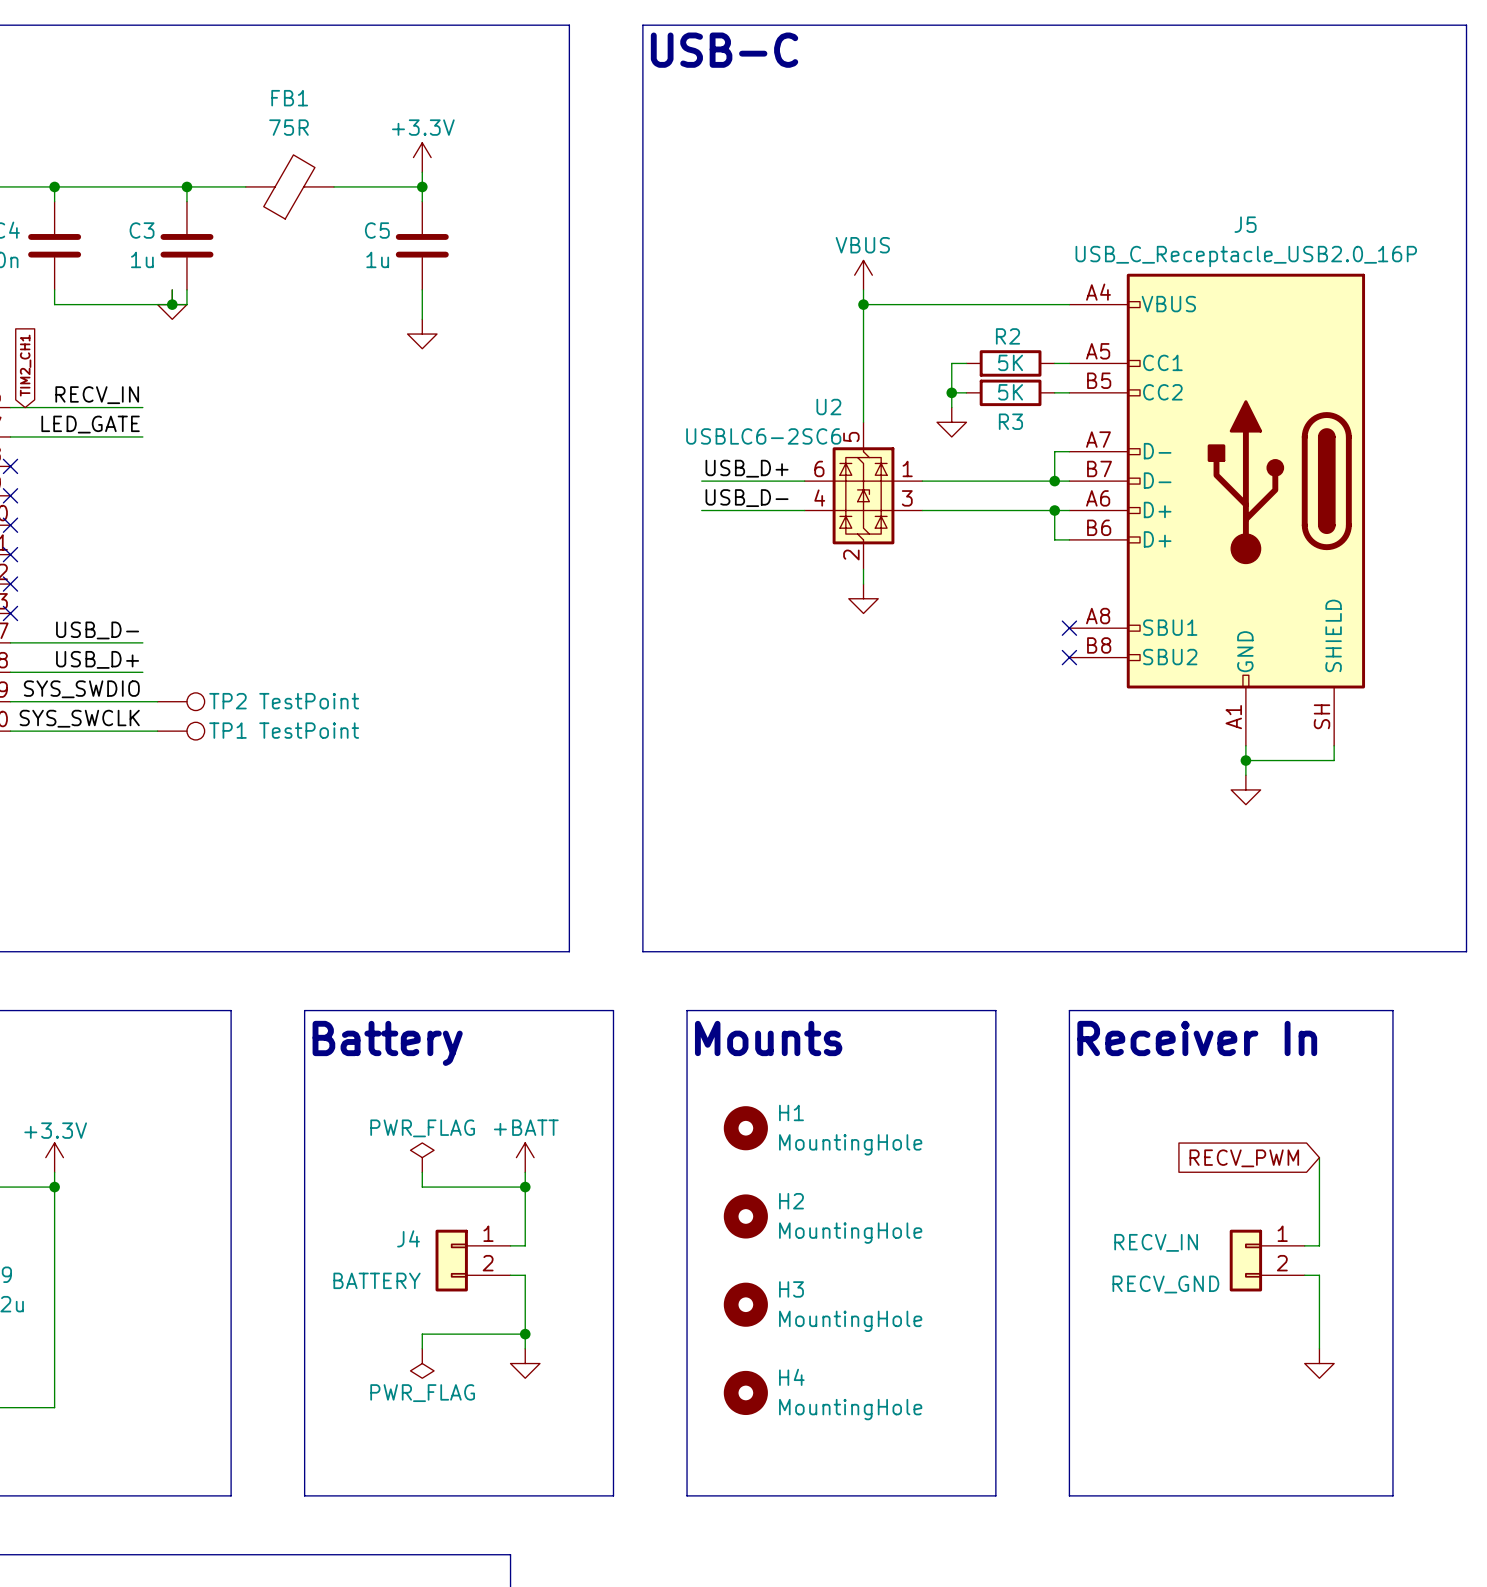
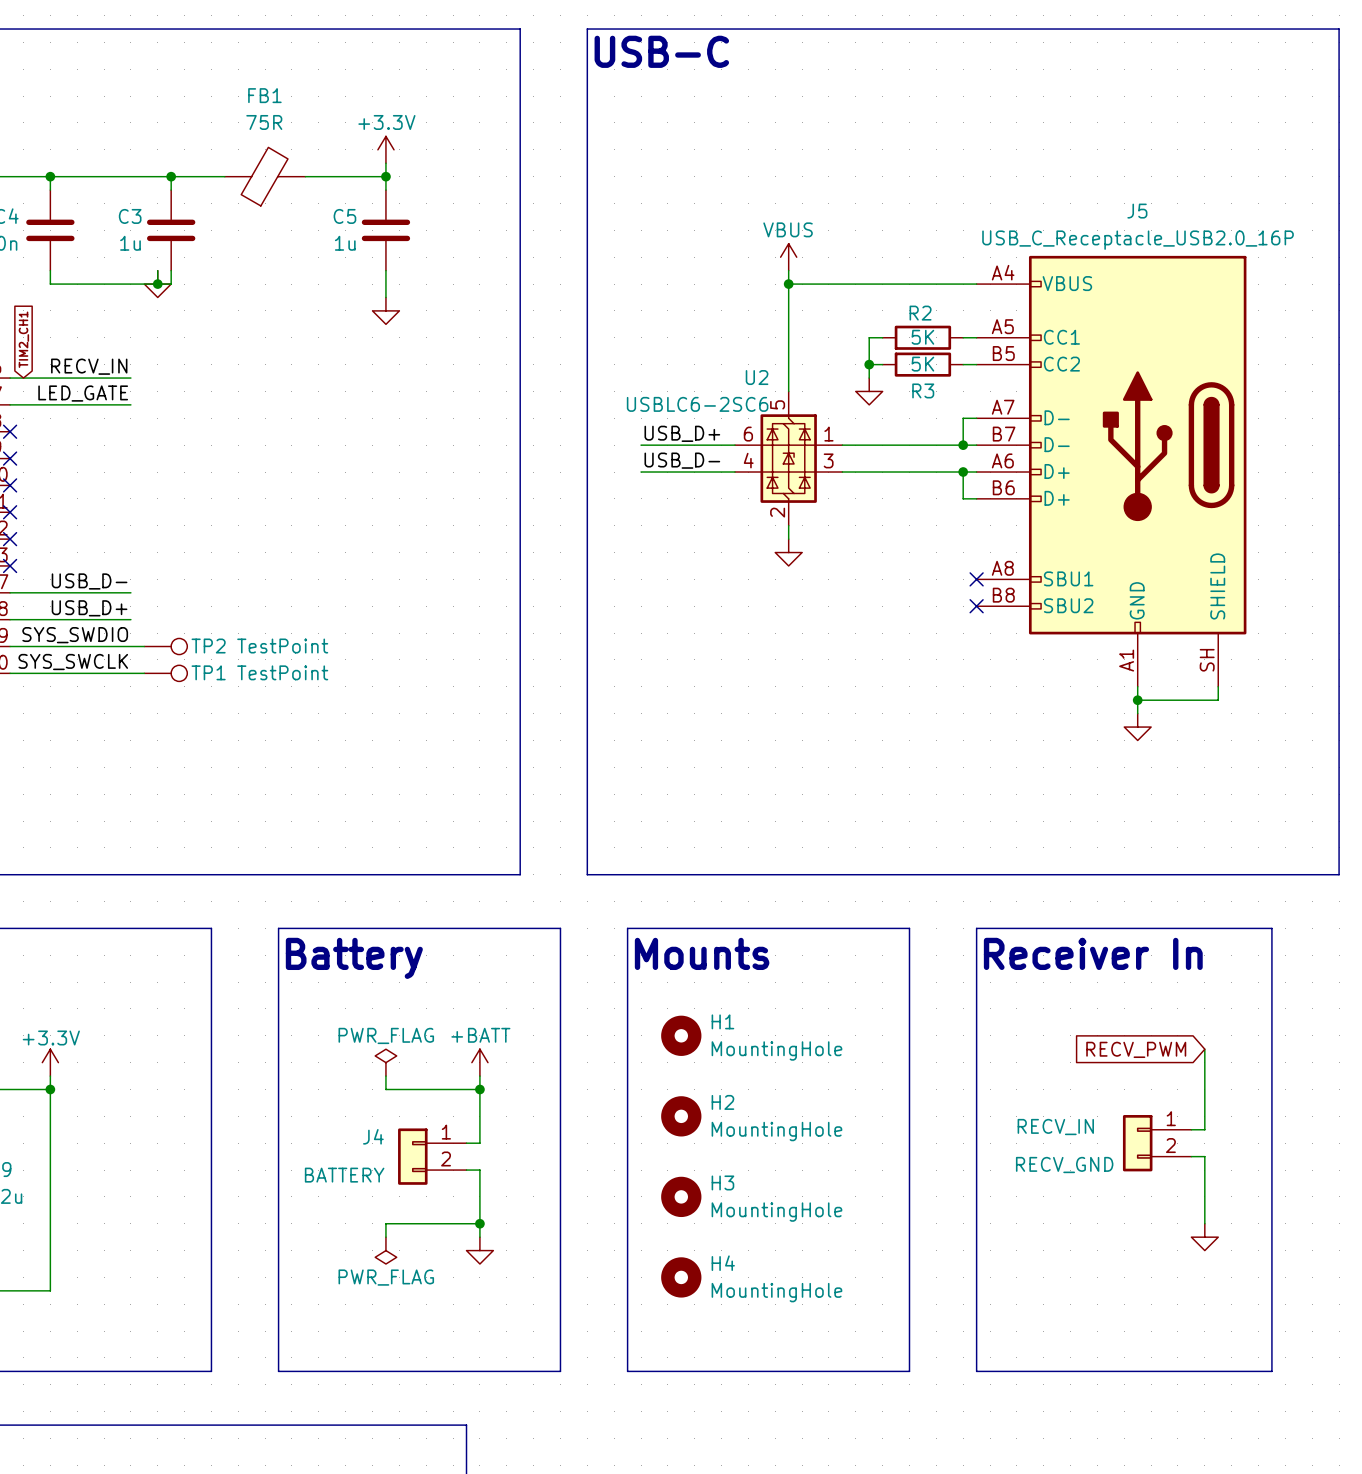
global label position: RECV_PWM (1244, 1158) -> RECV_PWM (1136, 1049)
wire: (1319, 1231) (1319, 1245) (1304, 1245) -> (1204, 1129) (1191, 1129)
RECV_IN position: (1267, 1260) -> (1157, 1143)
wire: (1304, 1275) (1319, 1275) -> (1191, 1156) (1204, 1156) (1204, 1170)
power symbol position: (1319, 1363) -> (1204, 1237)

